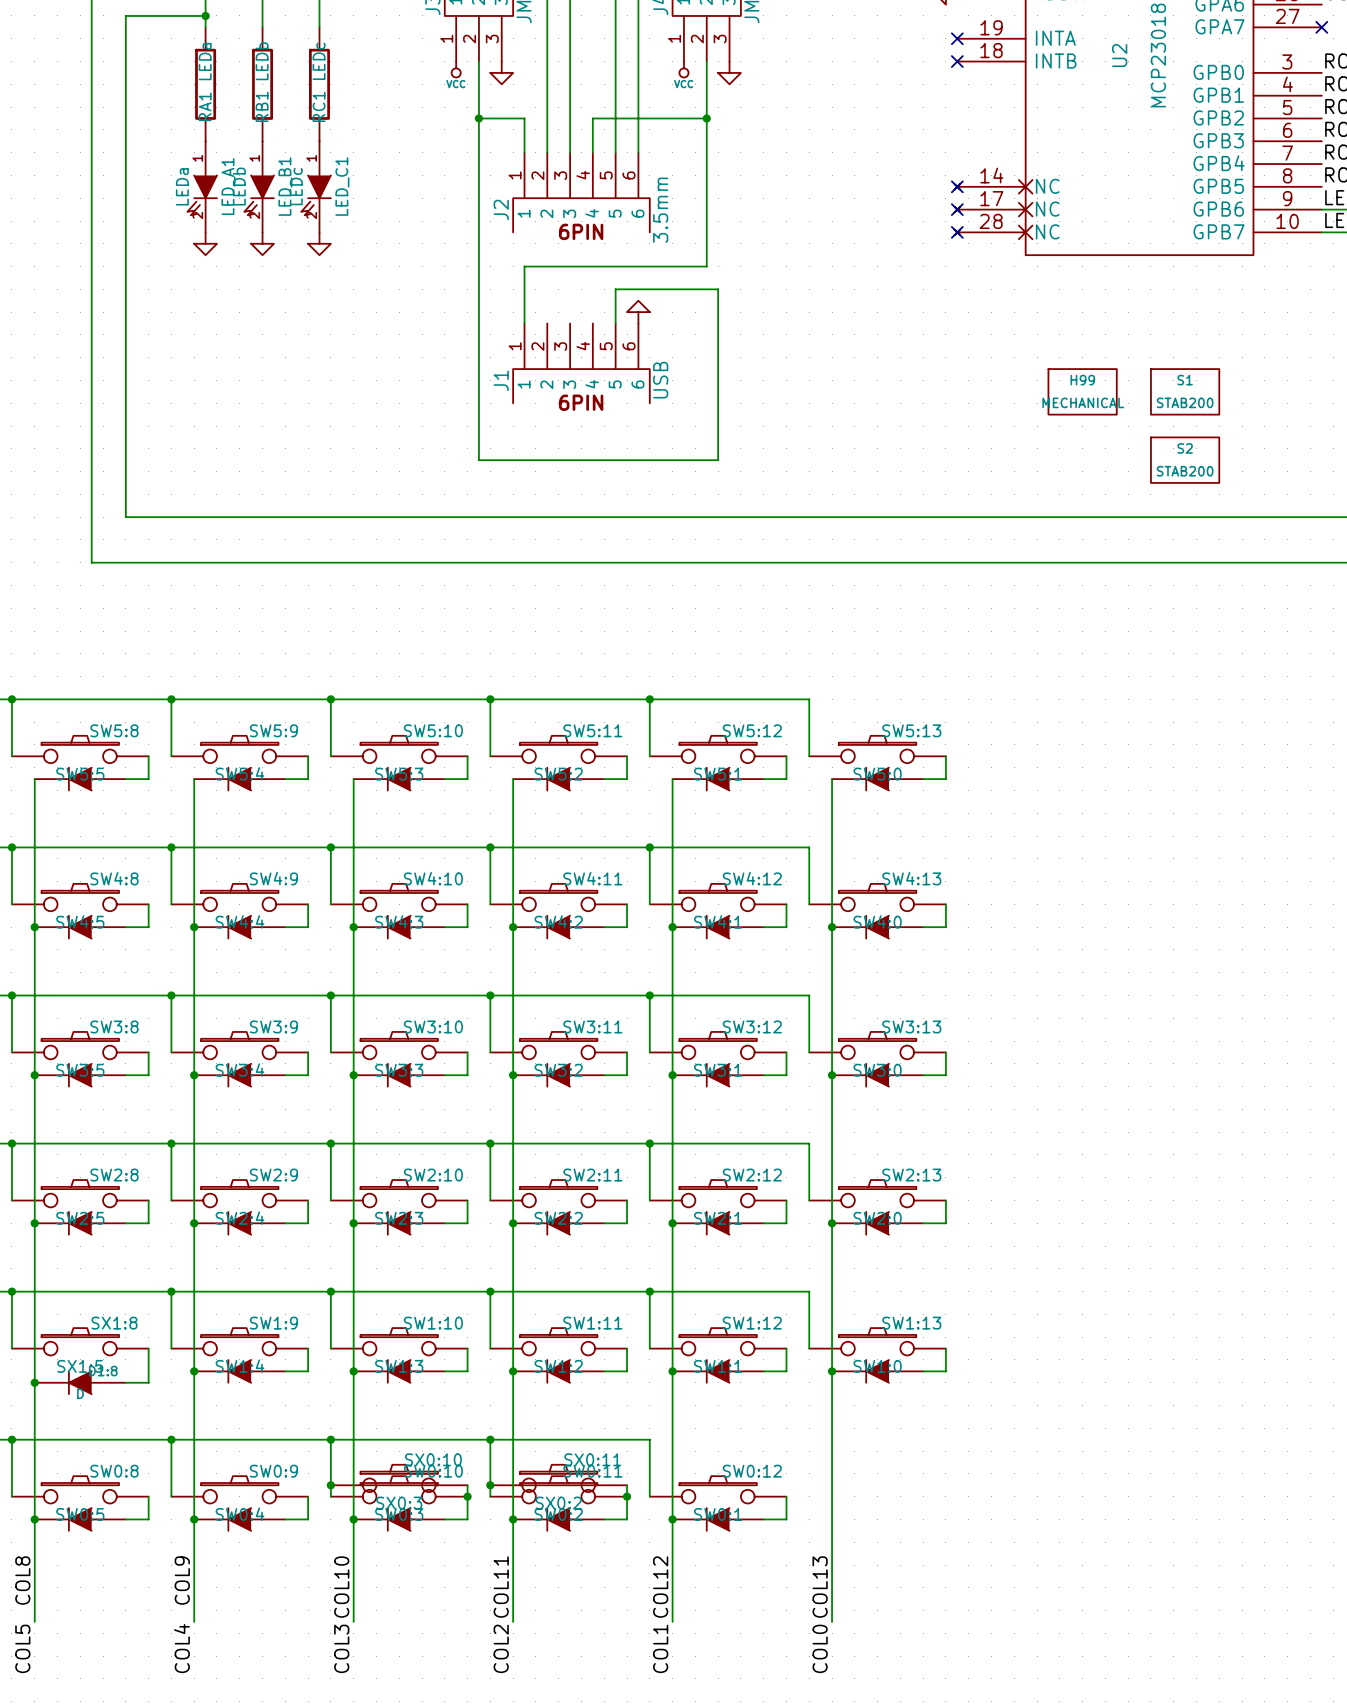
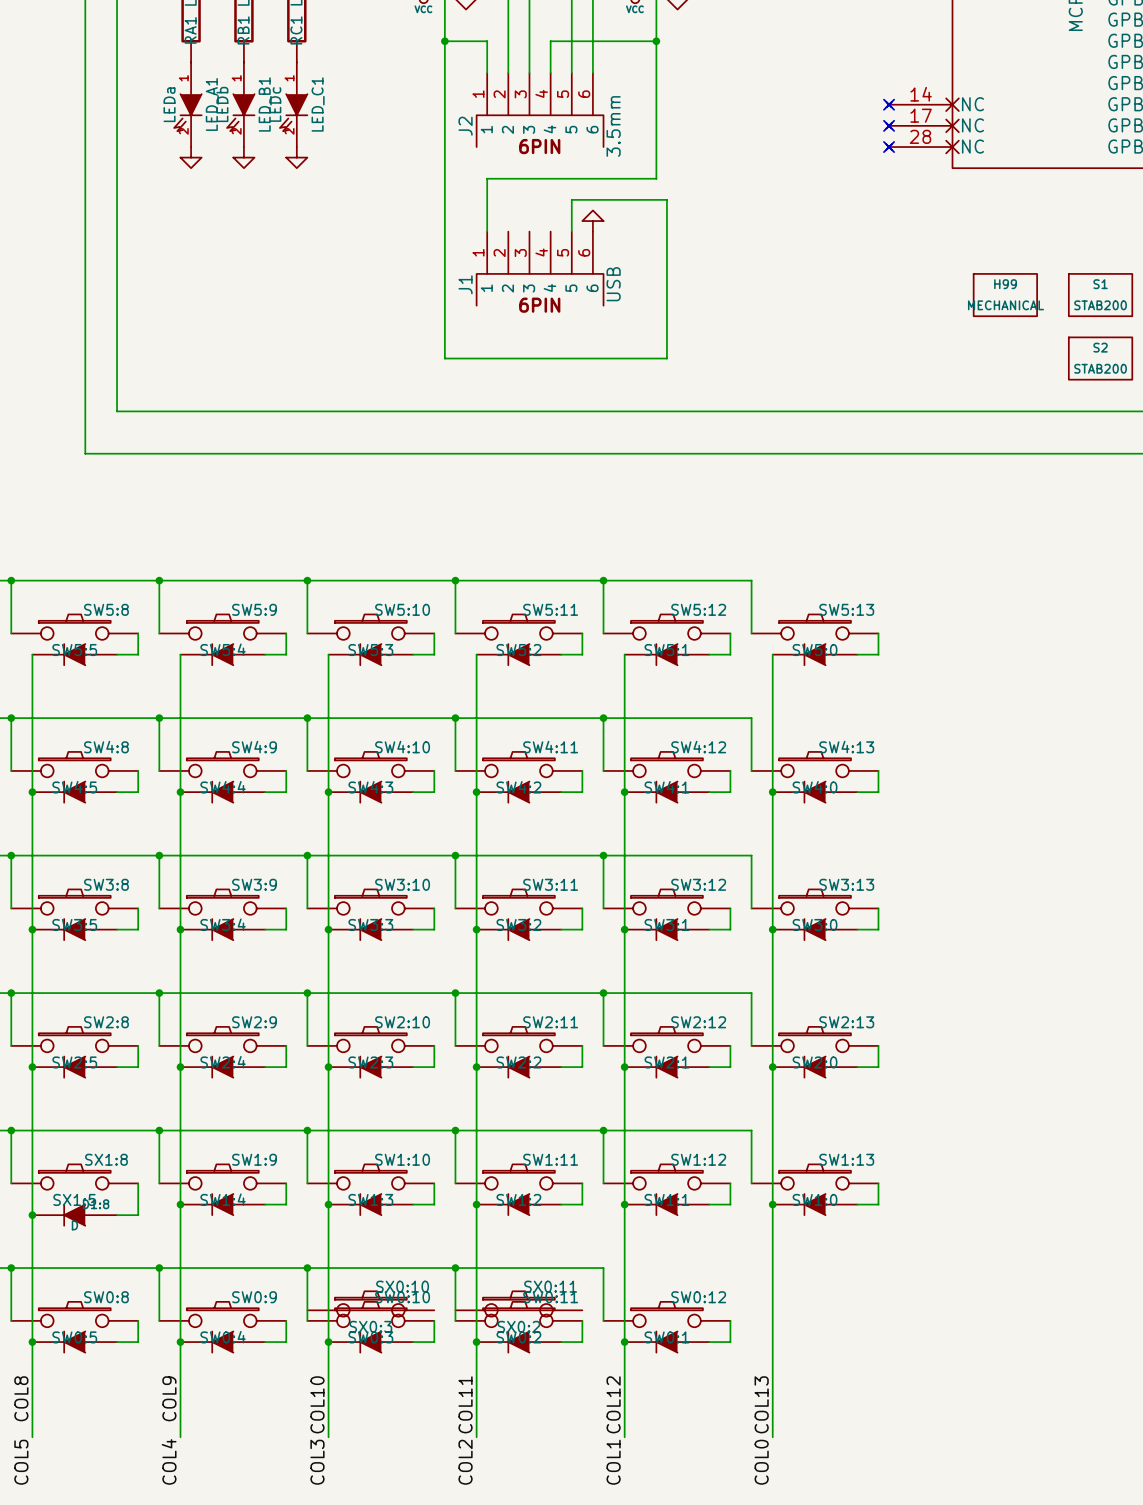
junction: (330, 1485) -> none
wire: (467, 1485) (467, 1496) -> none
junction: (490, 1485) -> none
wire: (627, 1485) (627, 1496) -> none
junction: (467, 1496) -> none
junction: (627, 1496) -> none

